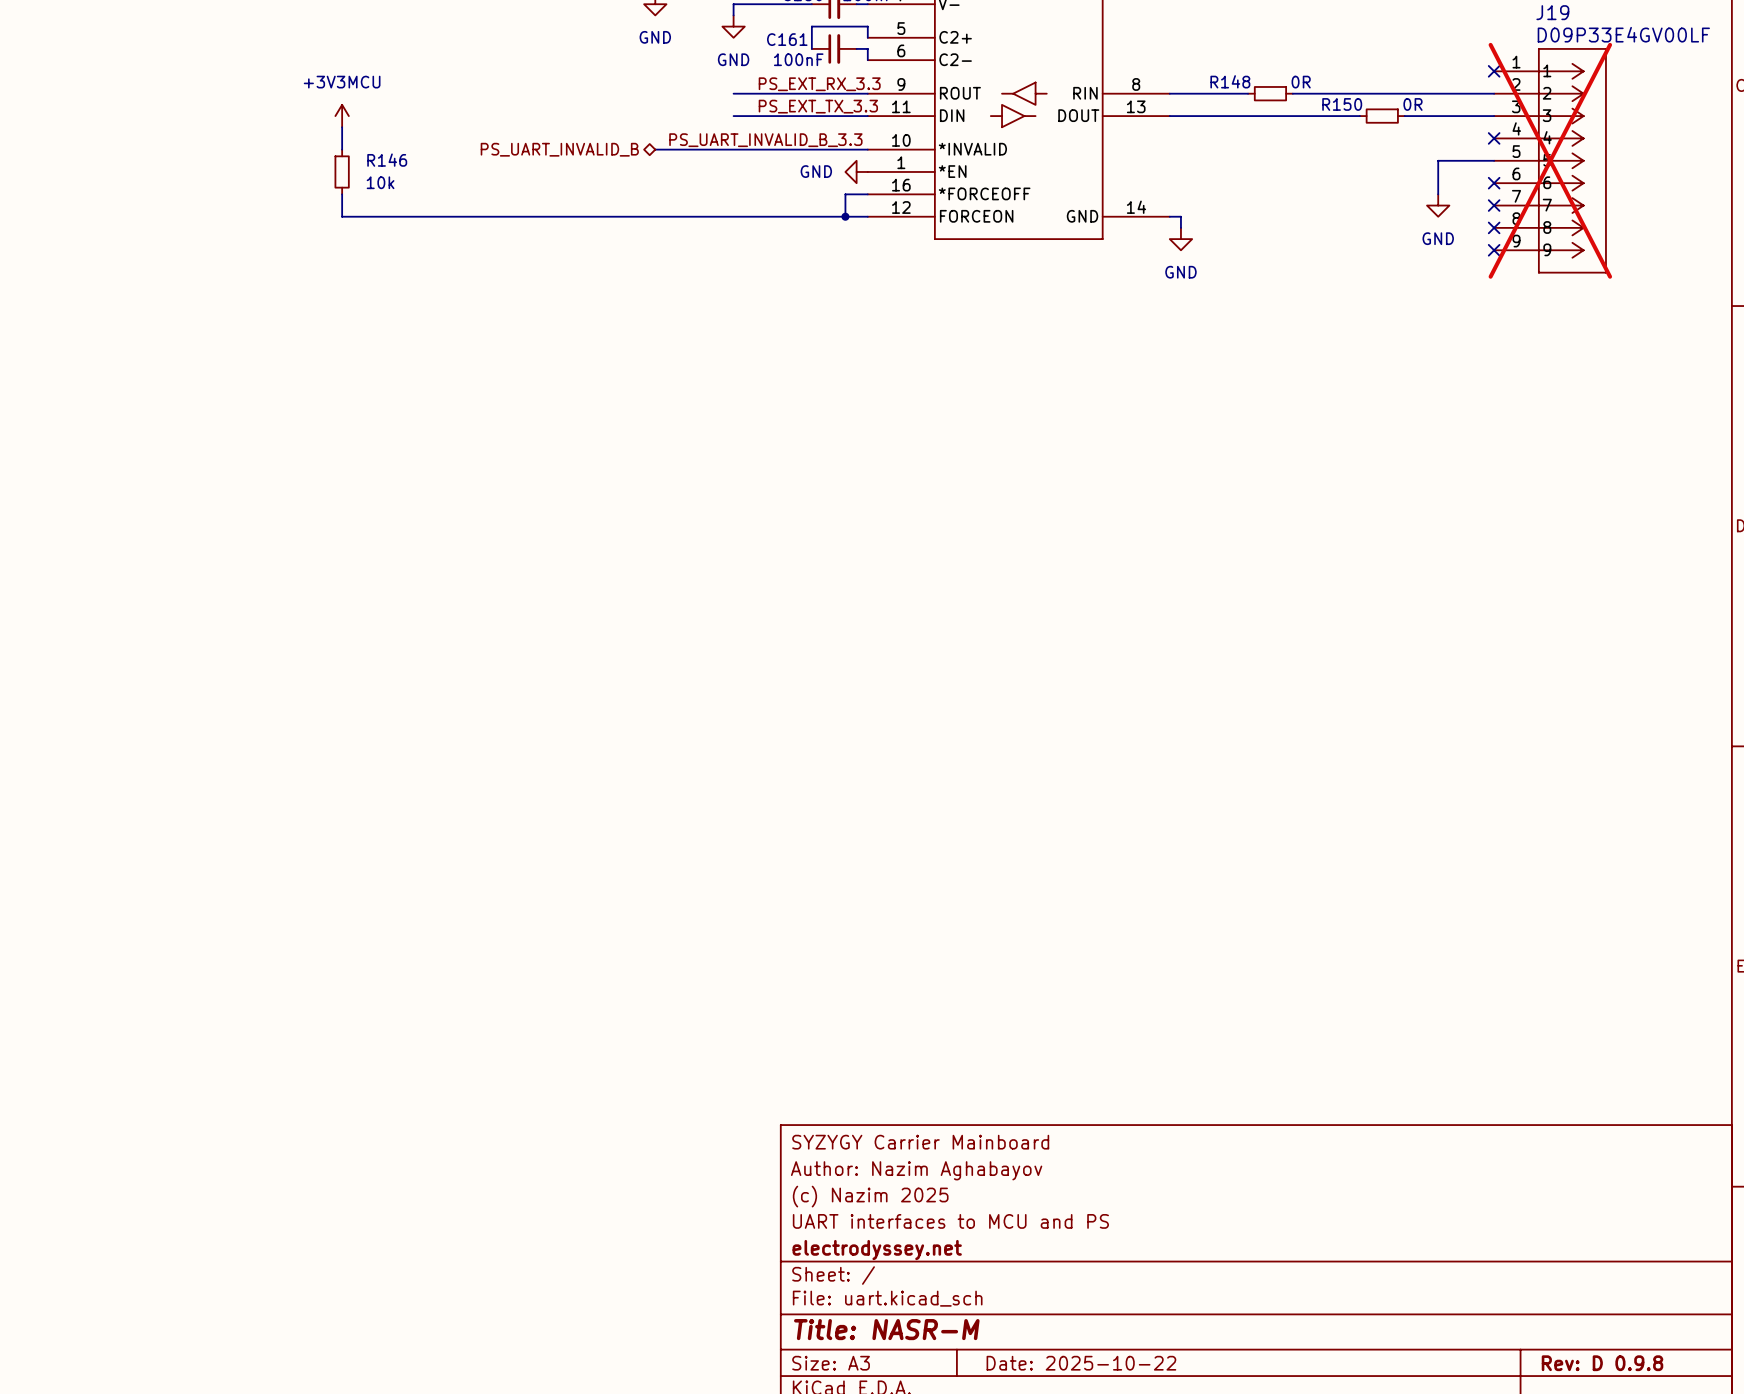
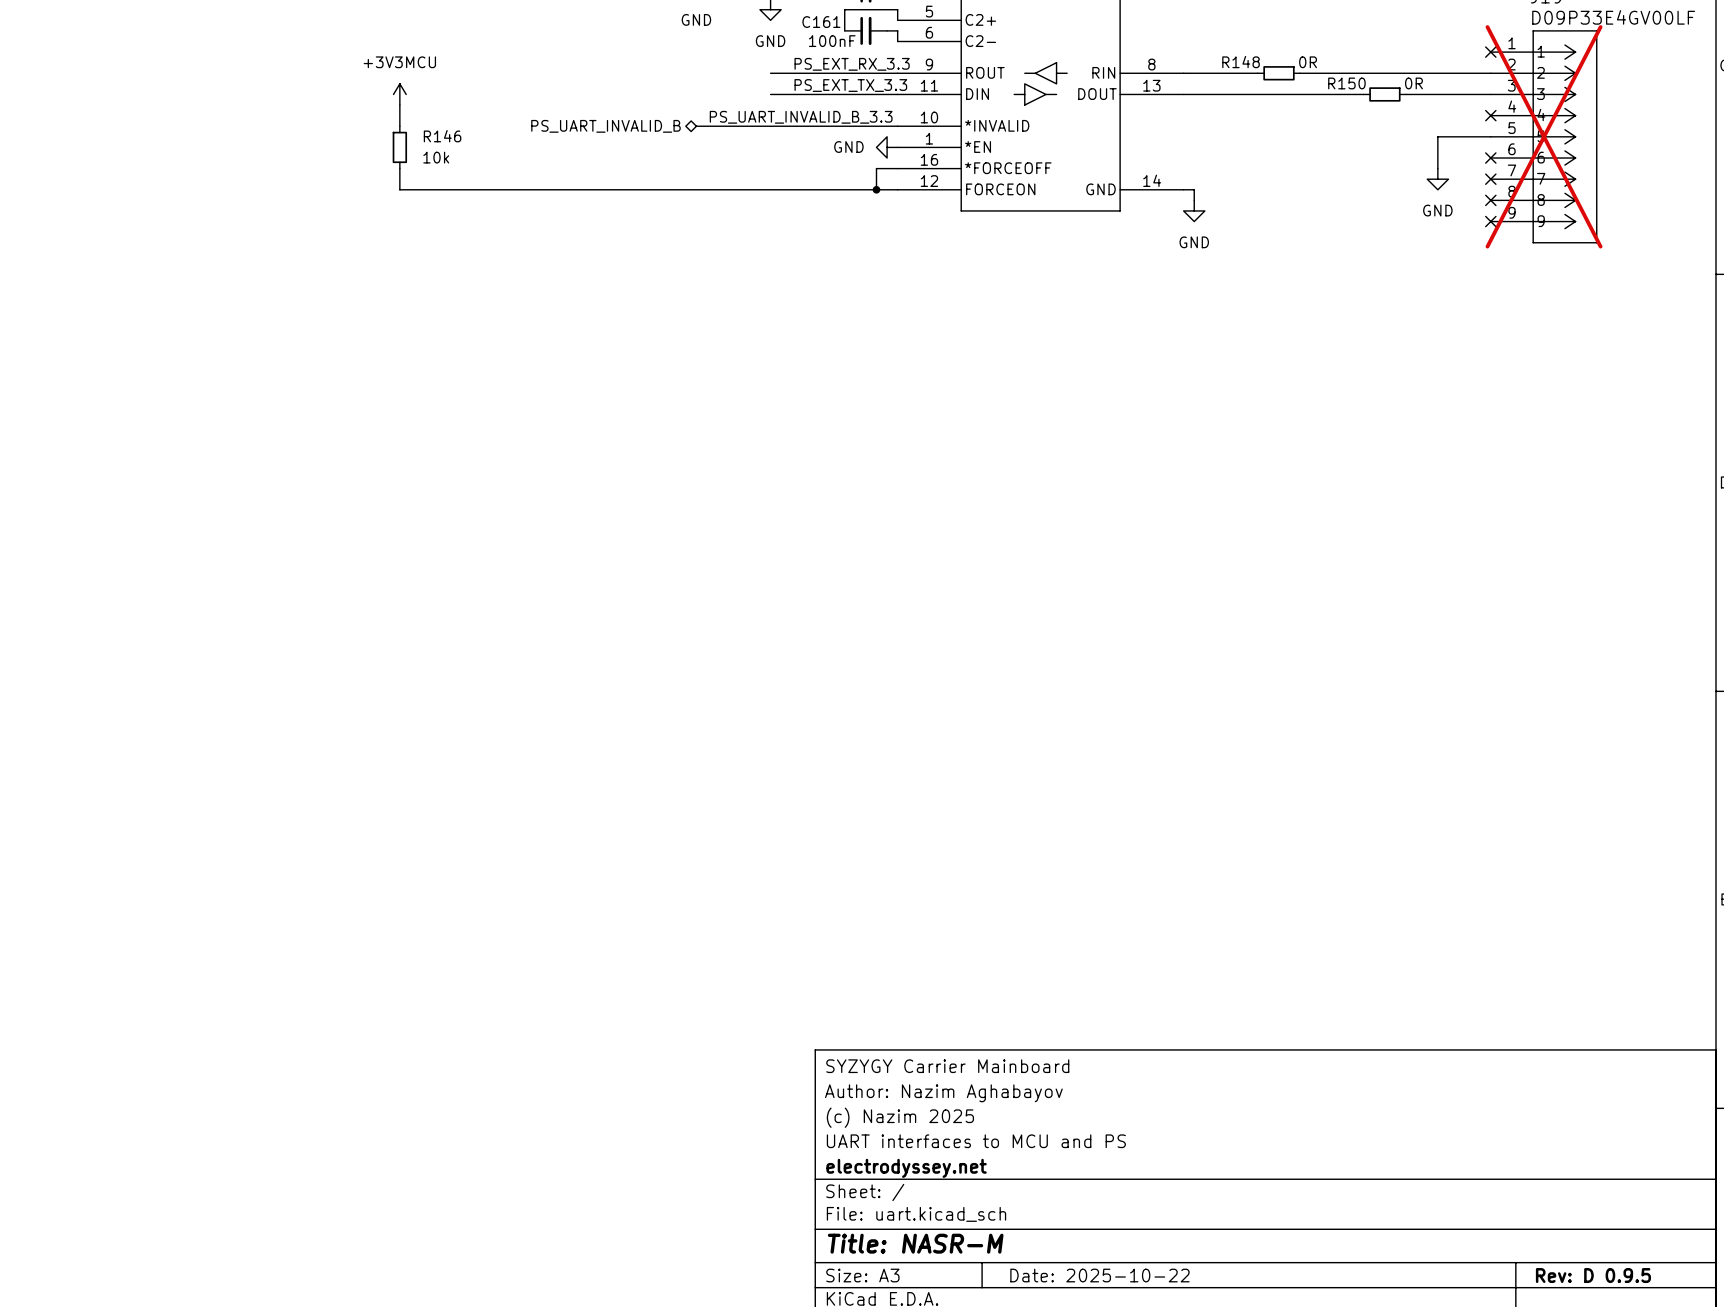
title block: Rev: D 0.9.8 (1602, 1363) -> Rev: D 0.9.5 (1593, 1275)

